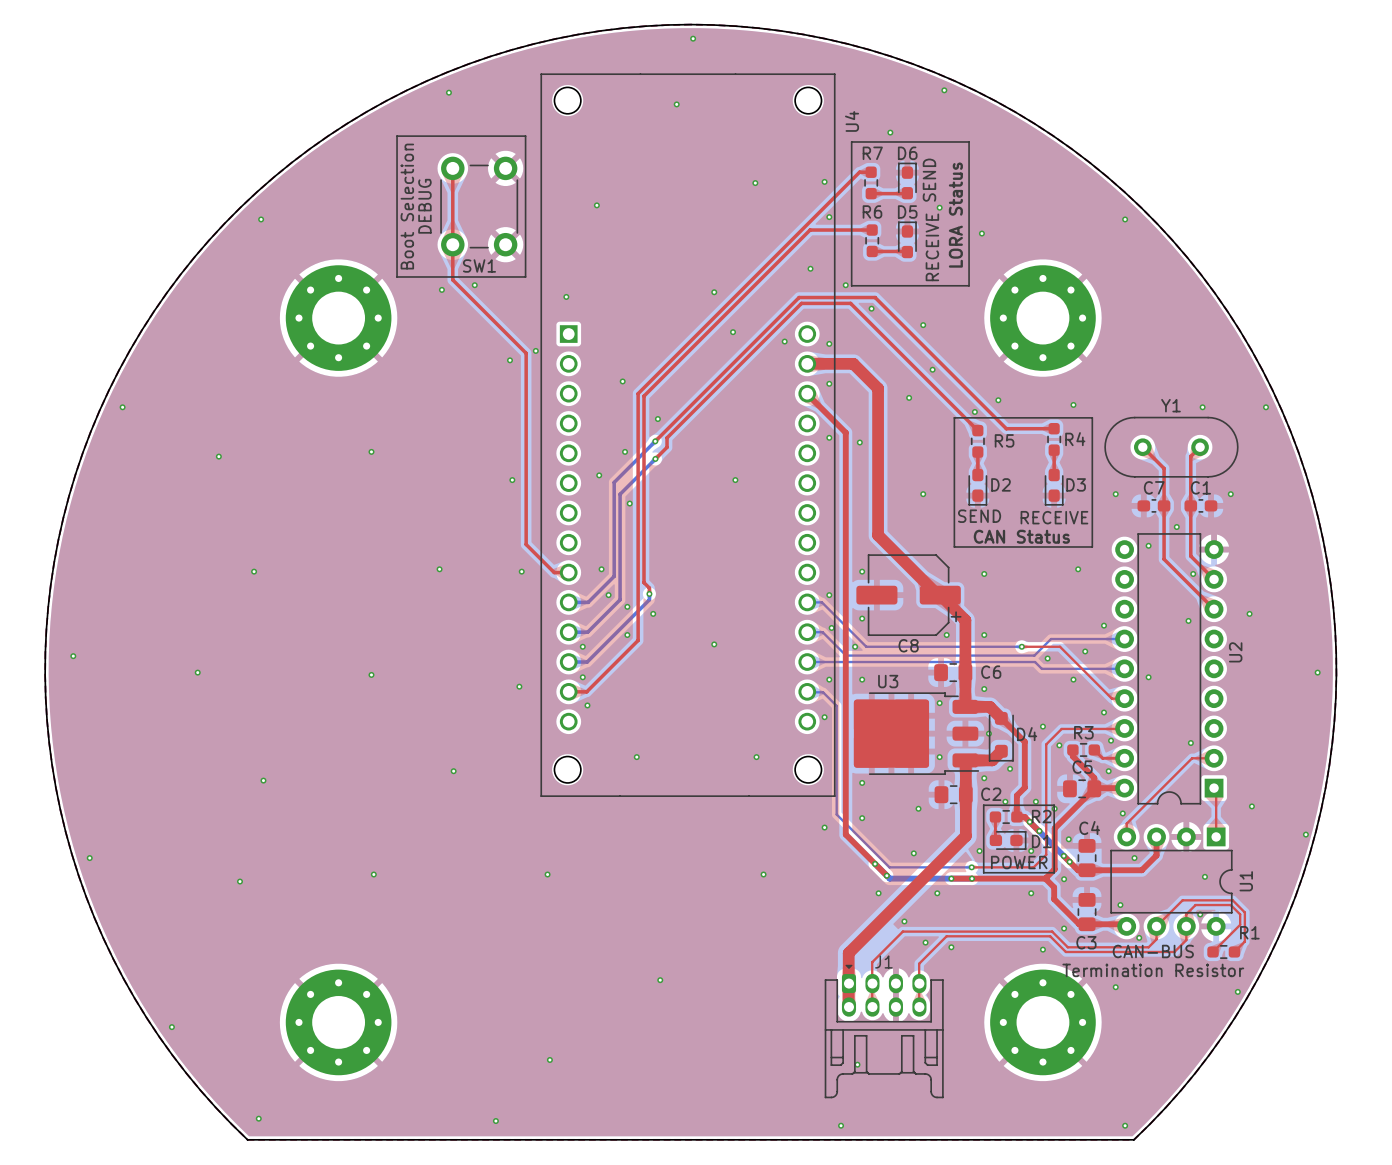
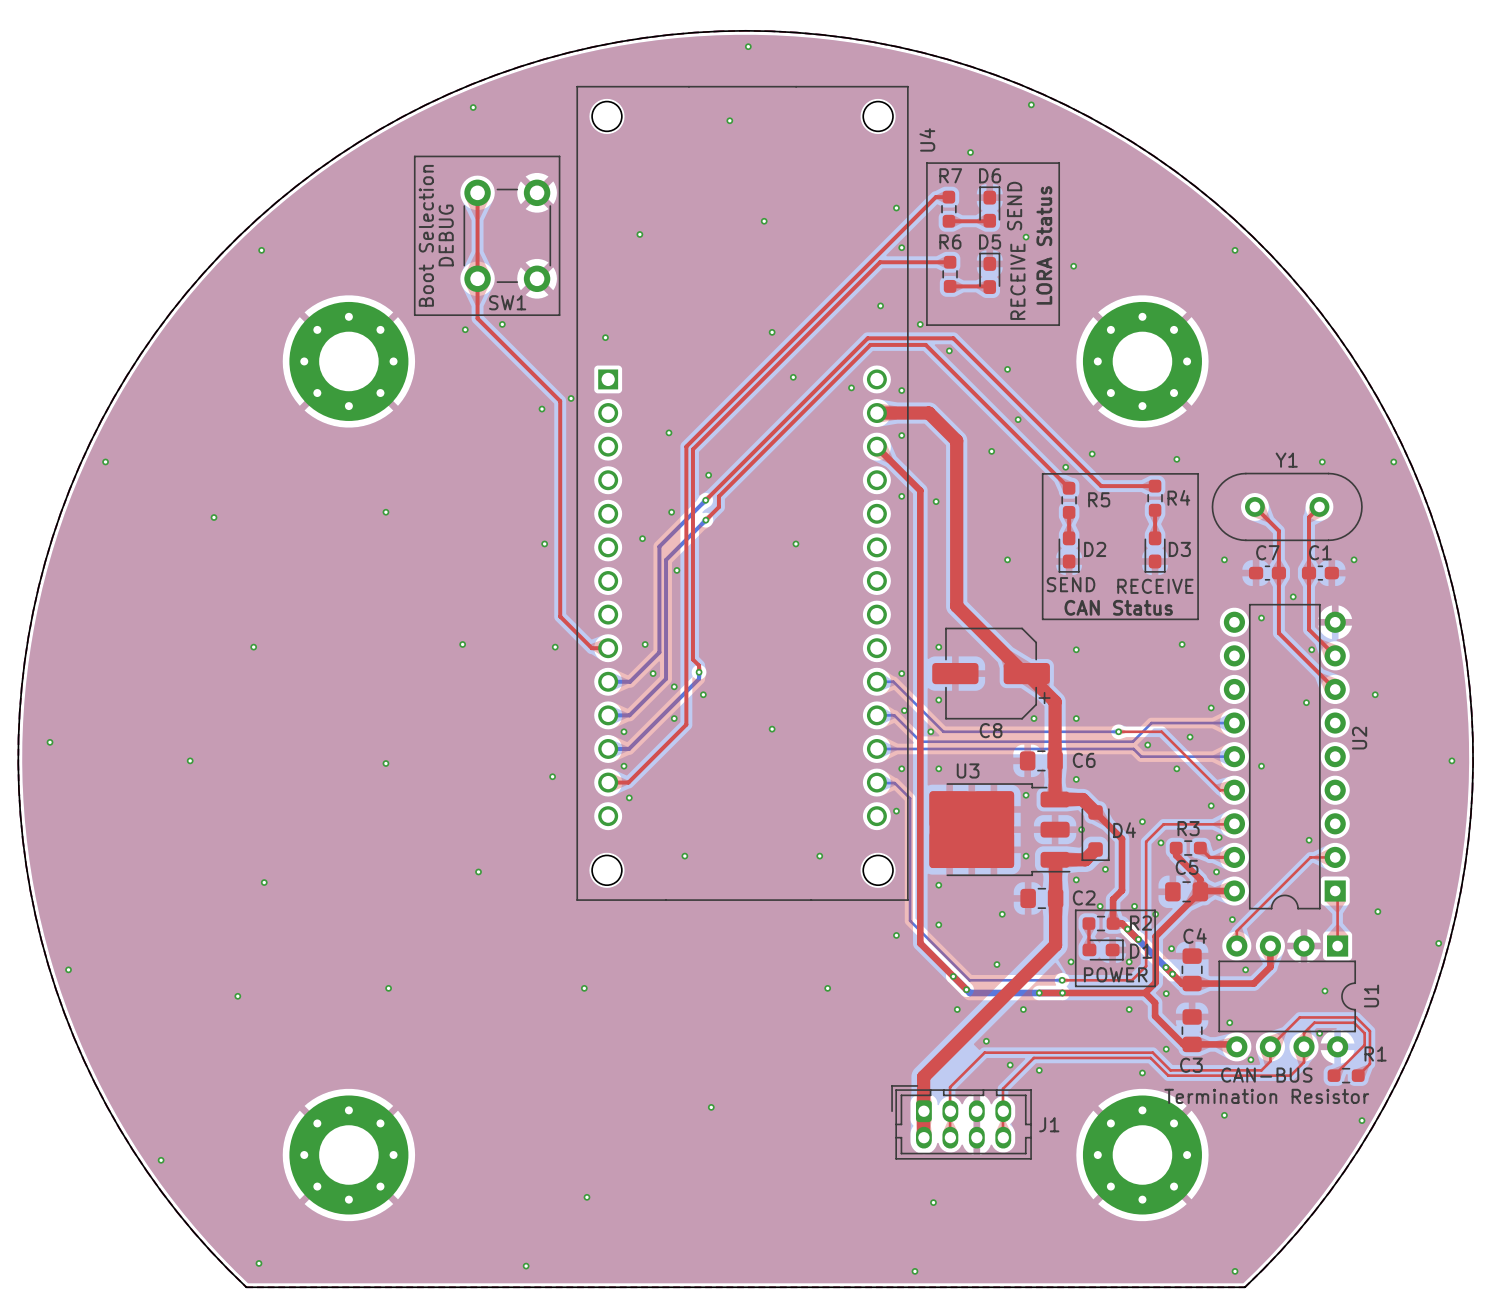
via position: (755, 183) -> (764, 221)
J1 name position: J1 (883, 962) -> J1 (1049, 1124)
J1 footprint: [824, 964, 944, 1099] -> [891, 1085, 1032, 1160]

